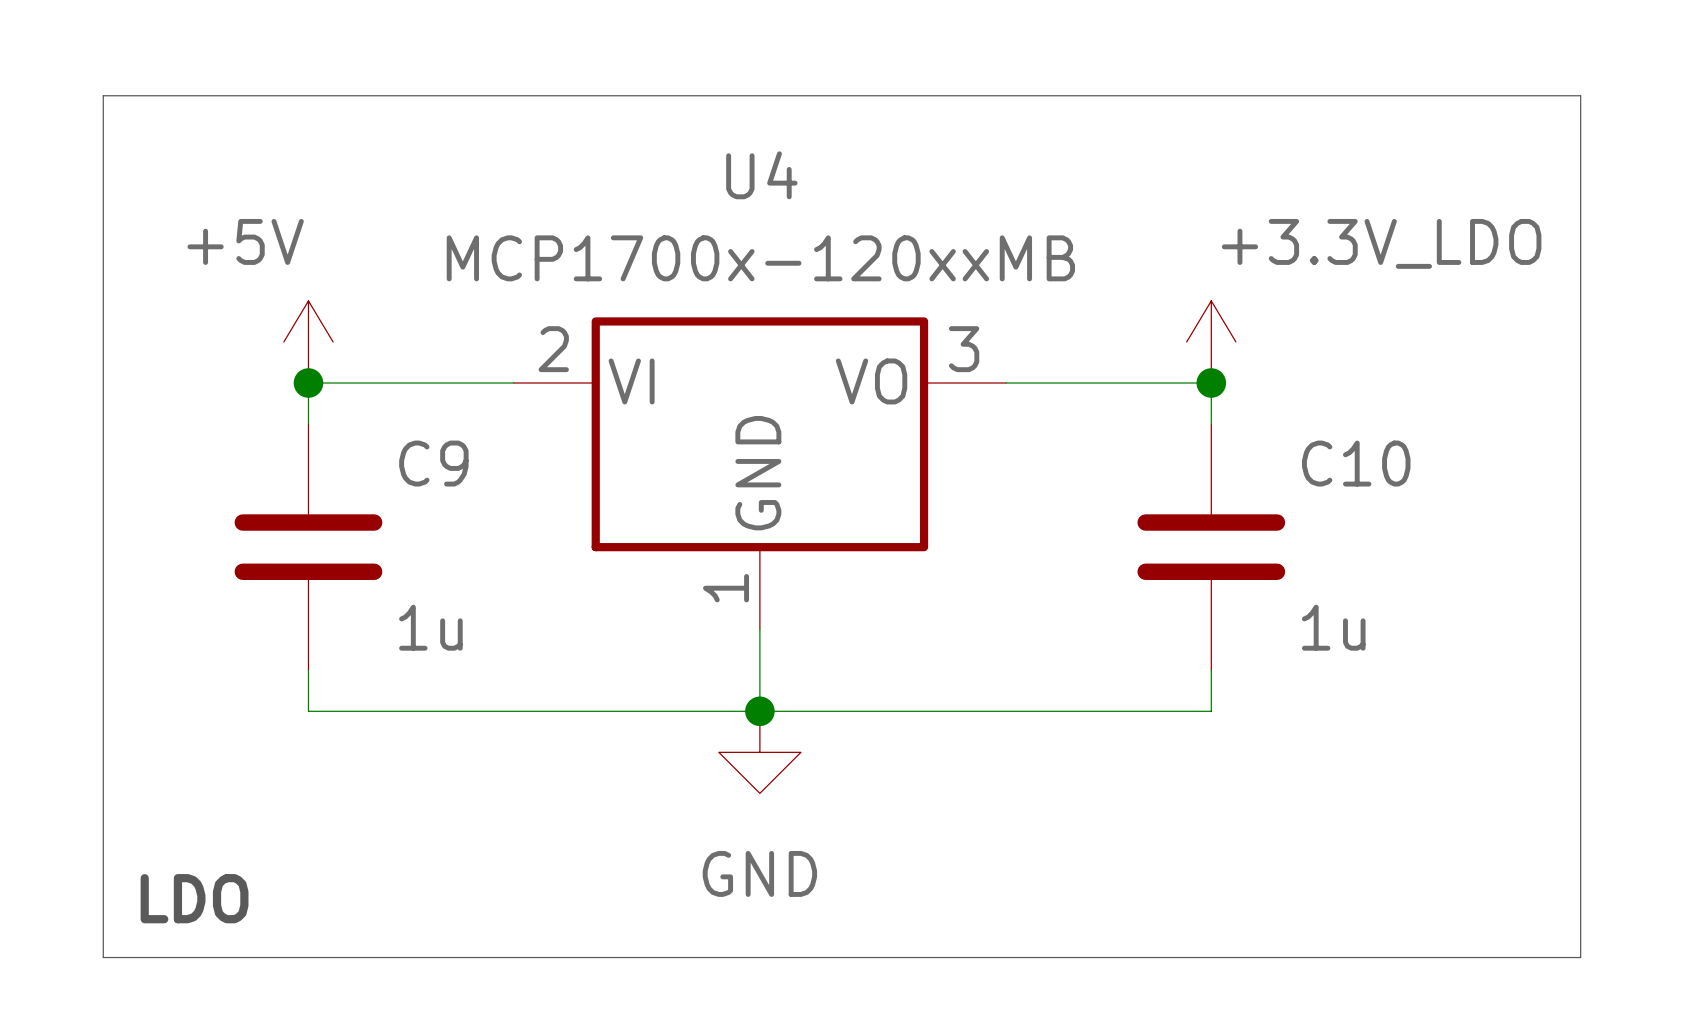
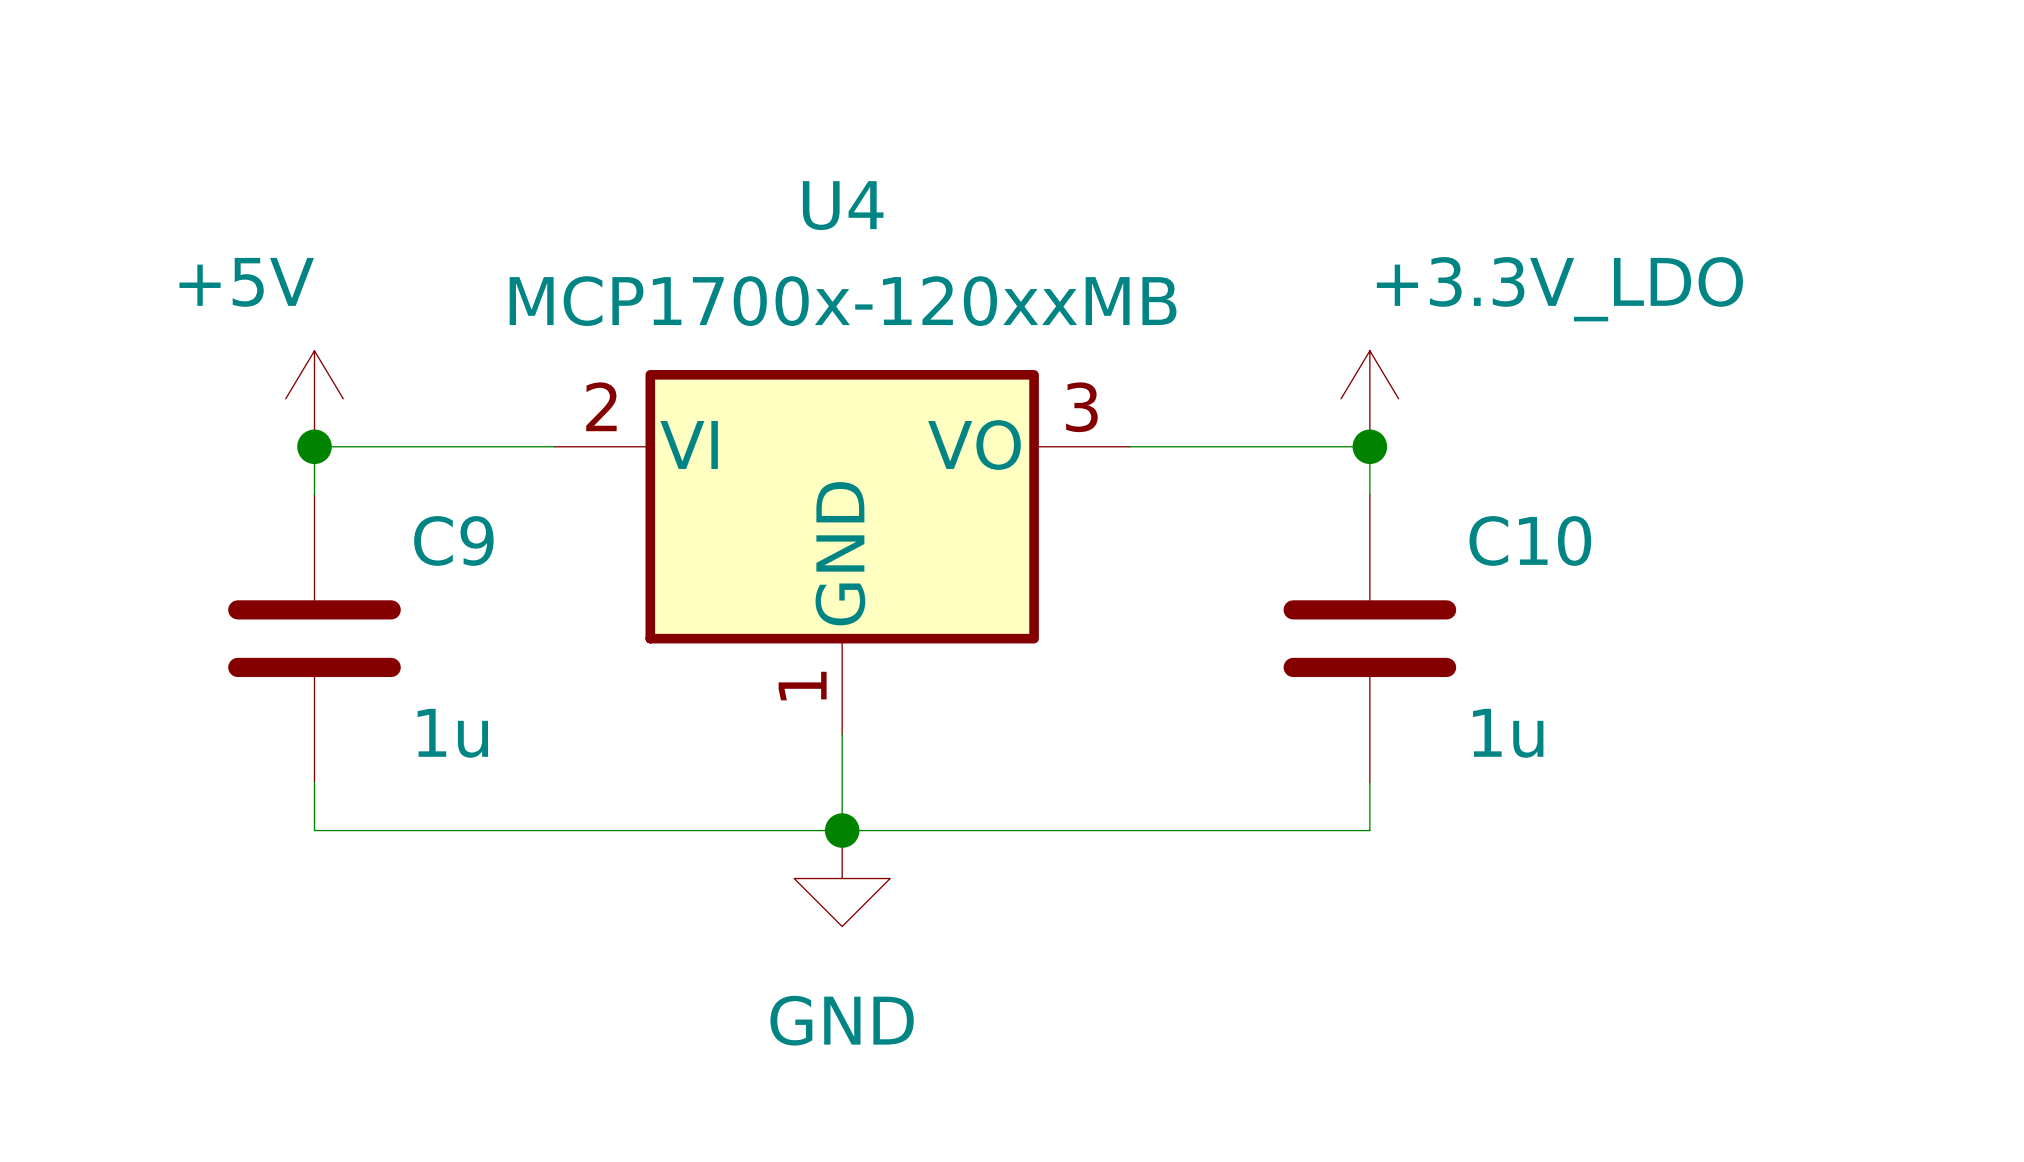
line: (103, 95) (103, 957) (1580, 957) (1580, 95) (103, 95) -> none
text: LDO (194, 898) -> none

